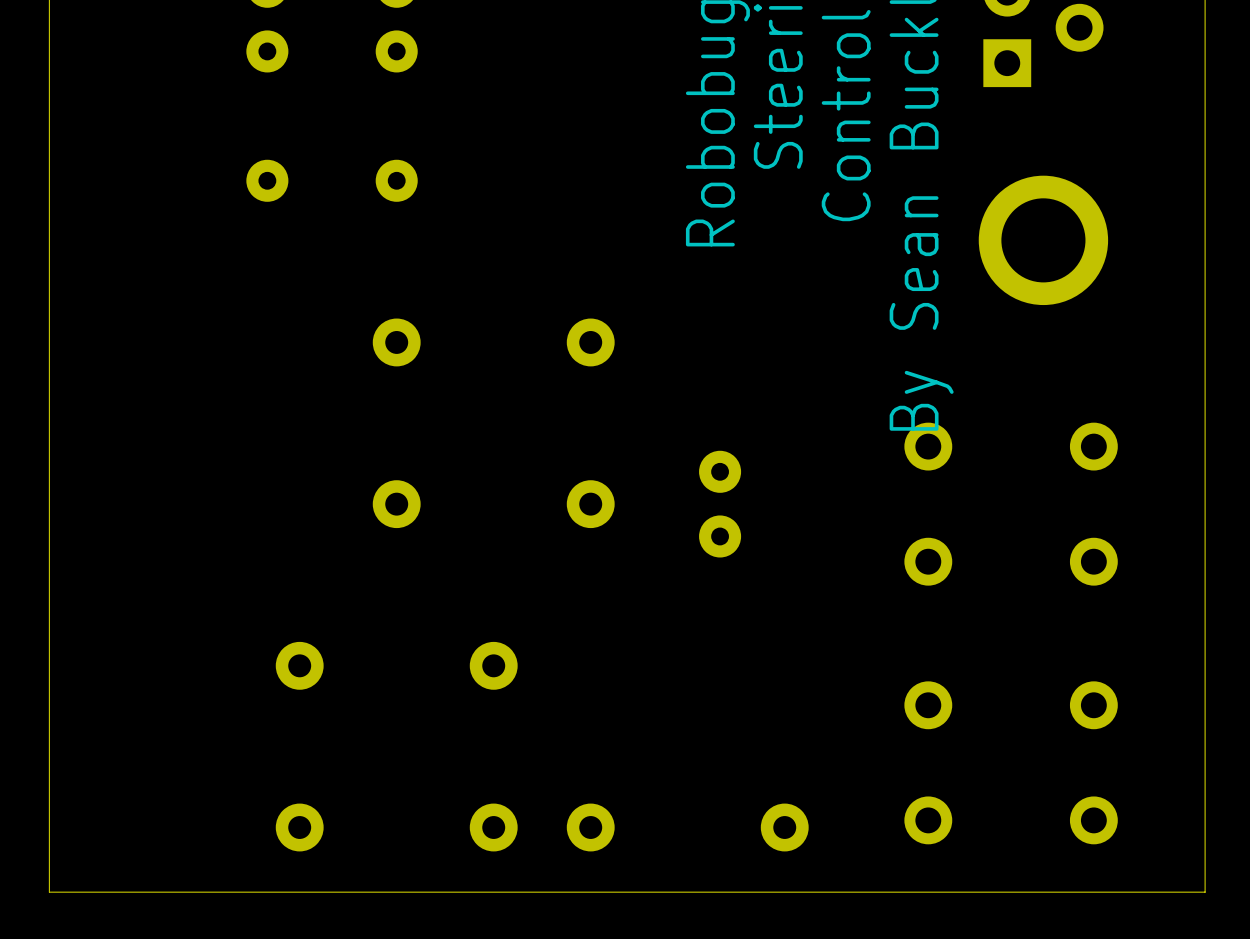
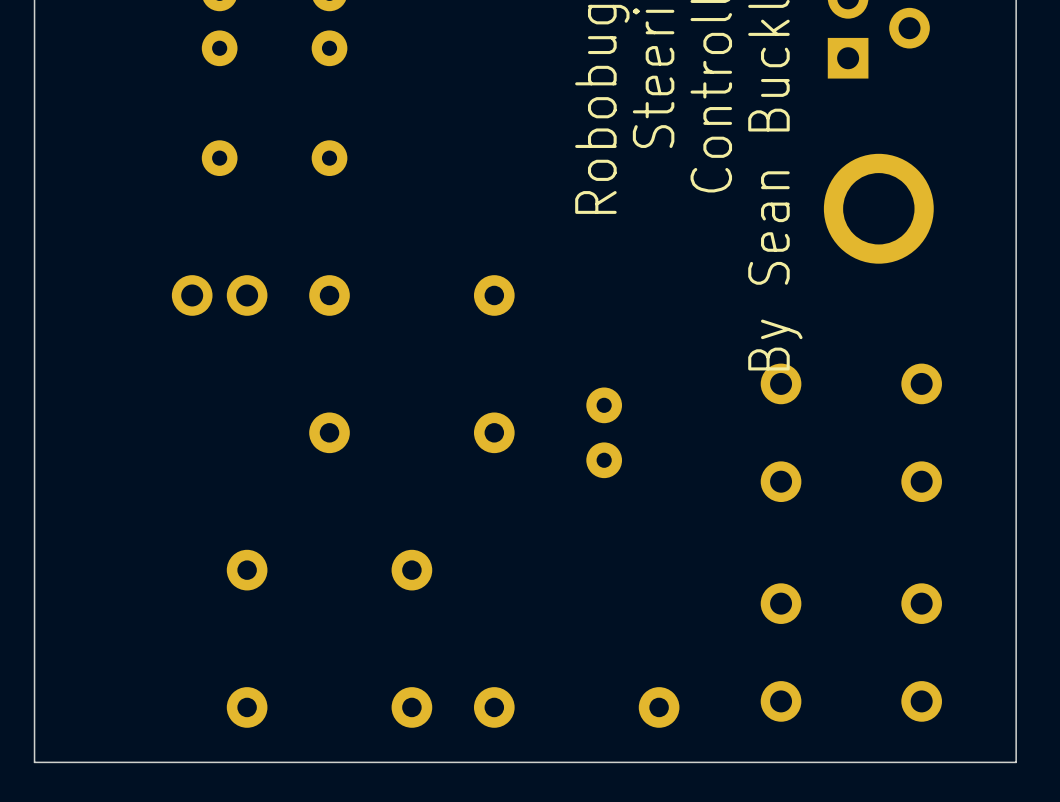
part: none -> (219, 295)

